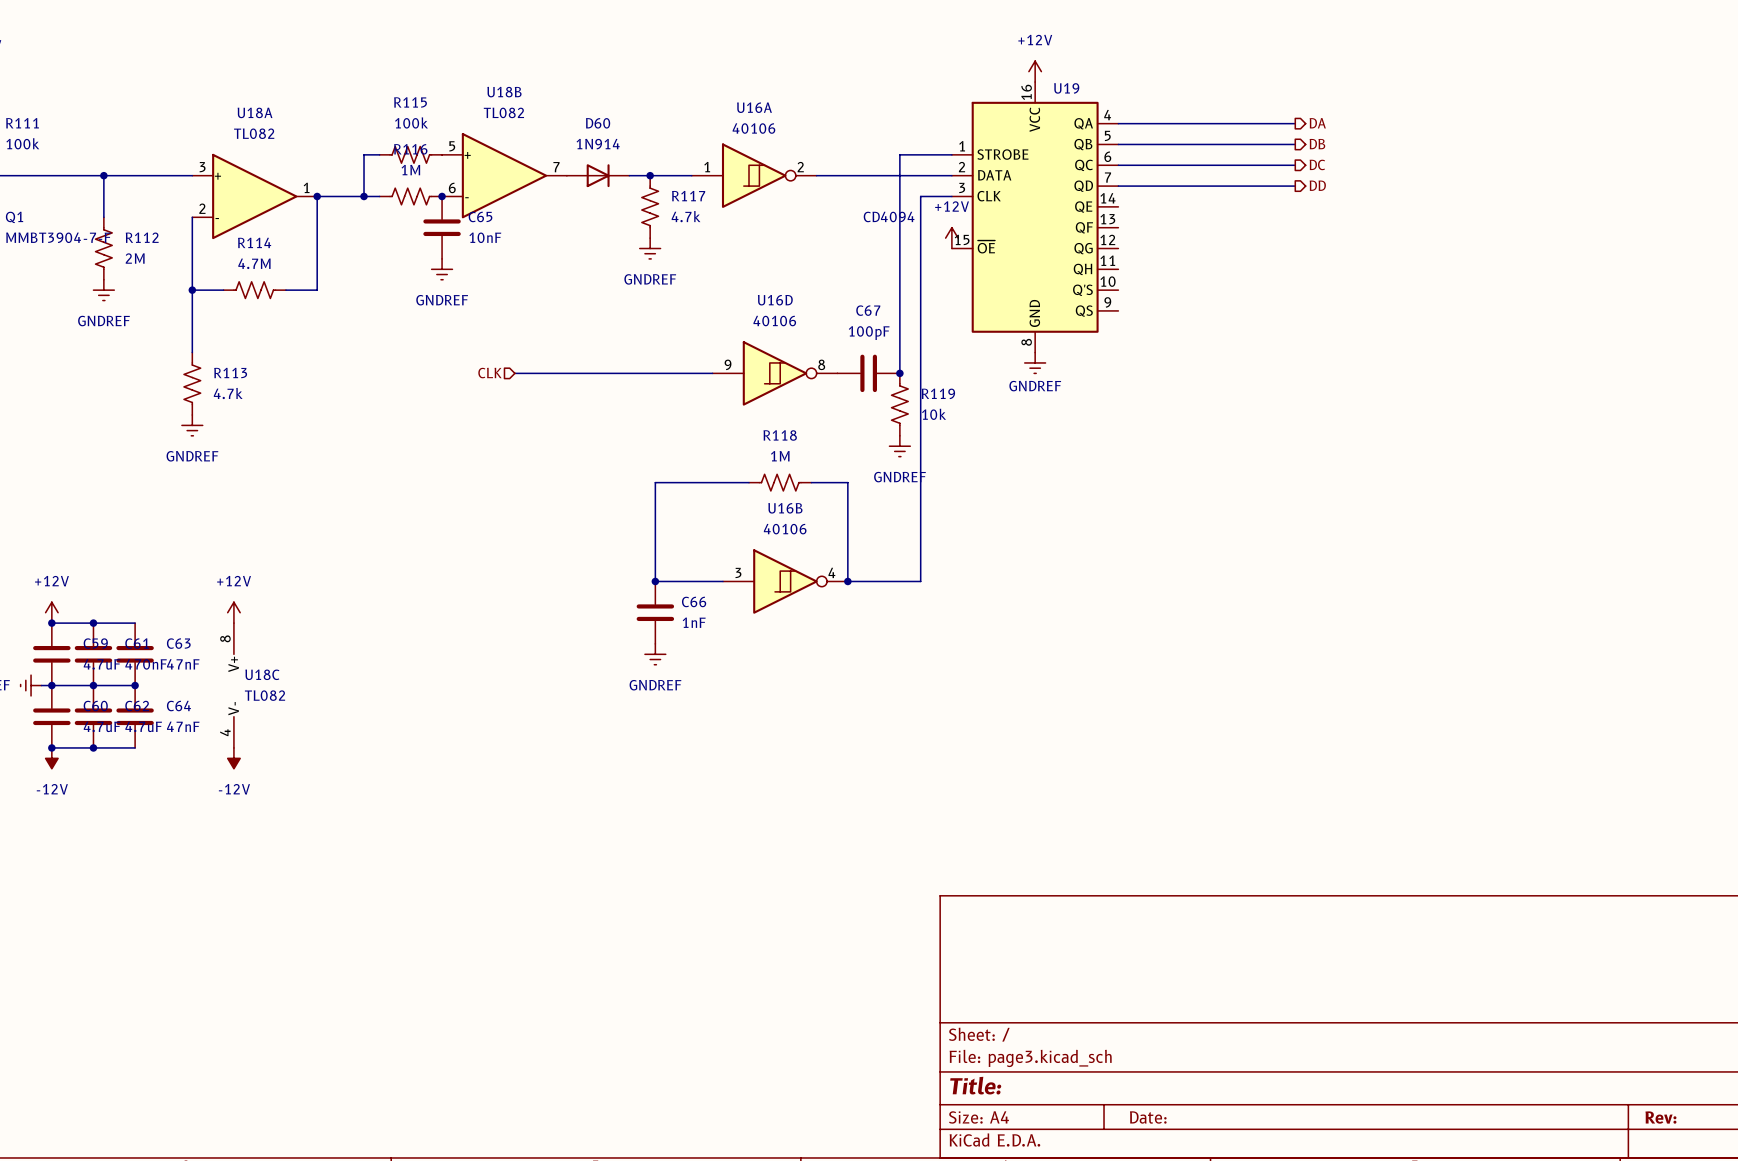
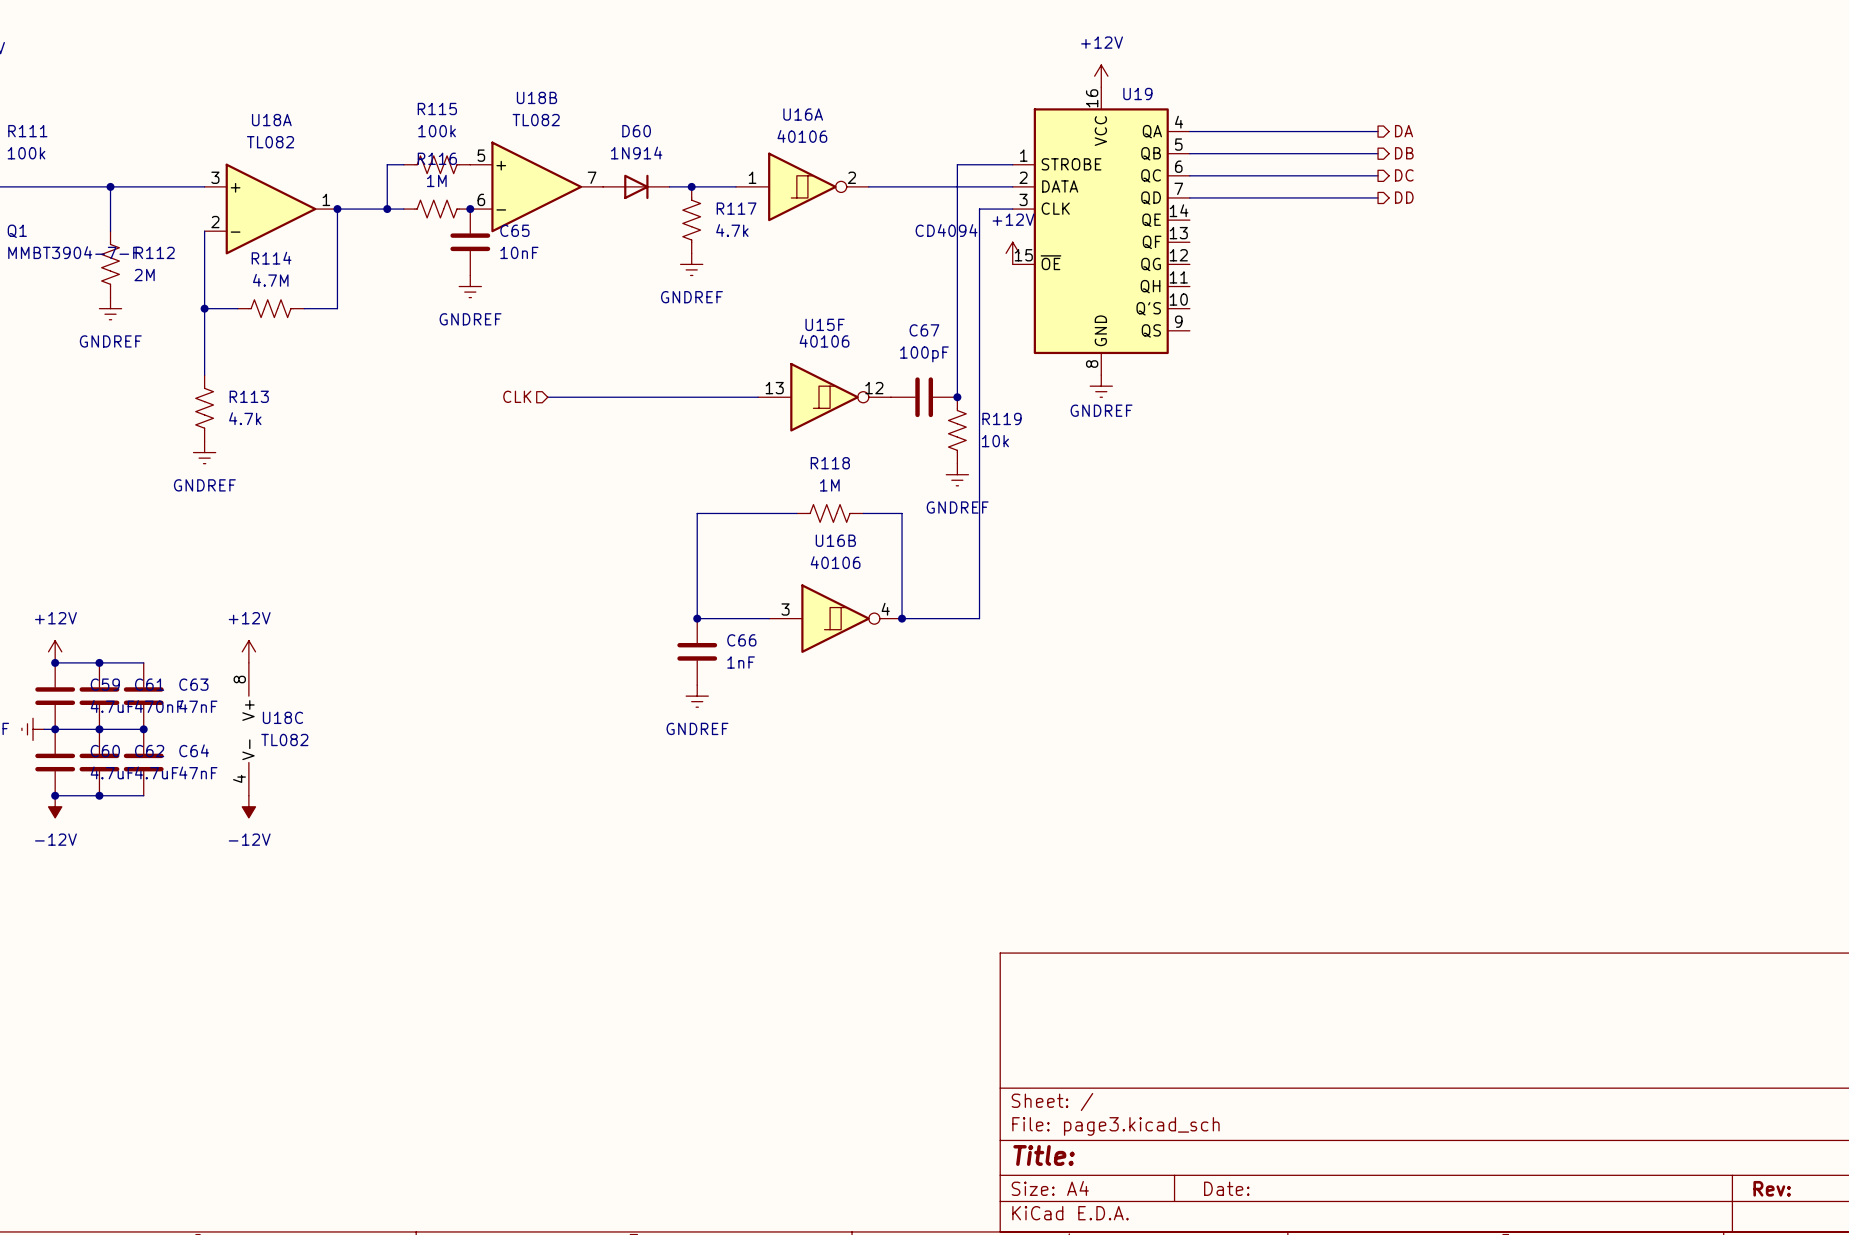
U16D name: U16D (775, 300) -> U15F (825, 324)
U16D pin number: 9 (728, 364) -> 13 (774, 388)
U16D pin number: 8 (821, 364) -> 12 (874, 388)

